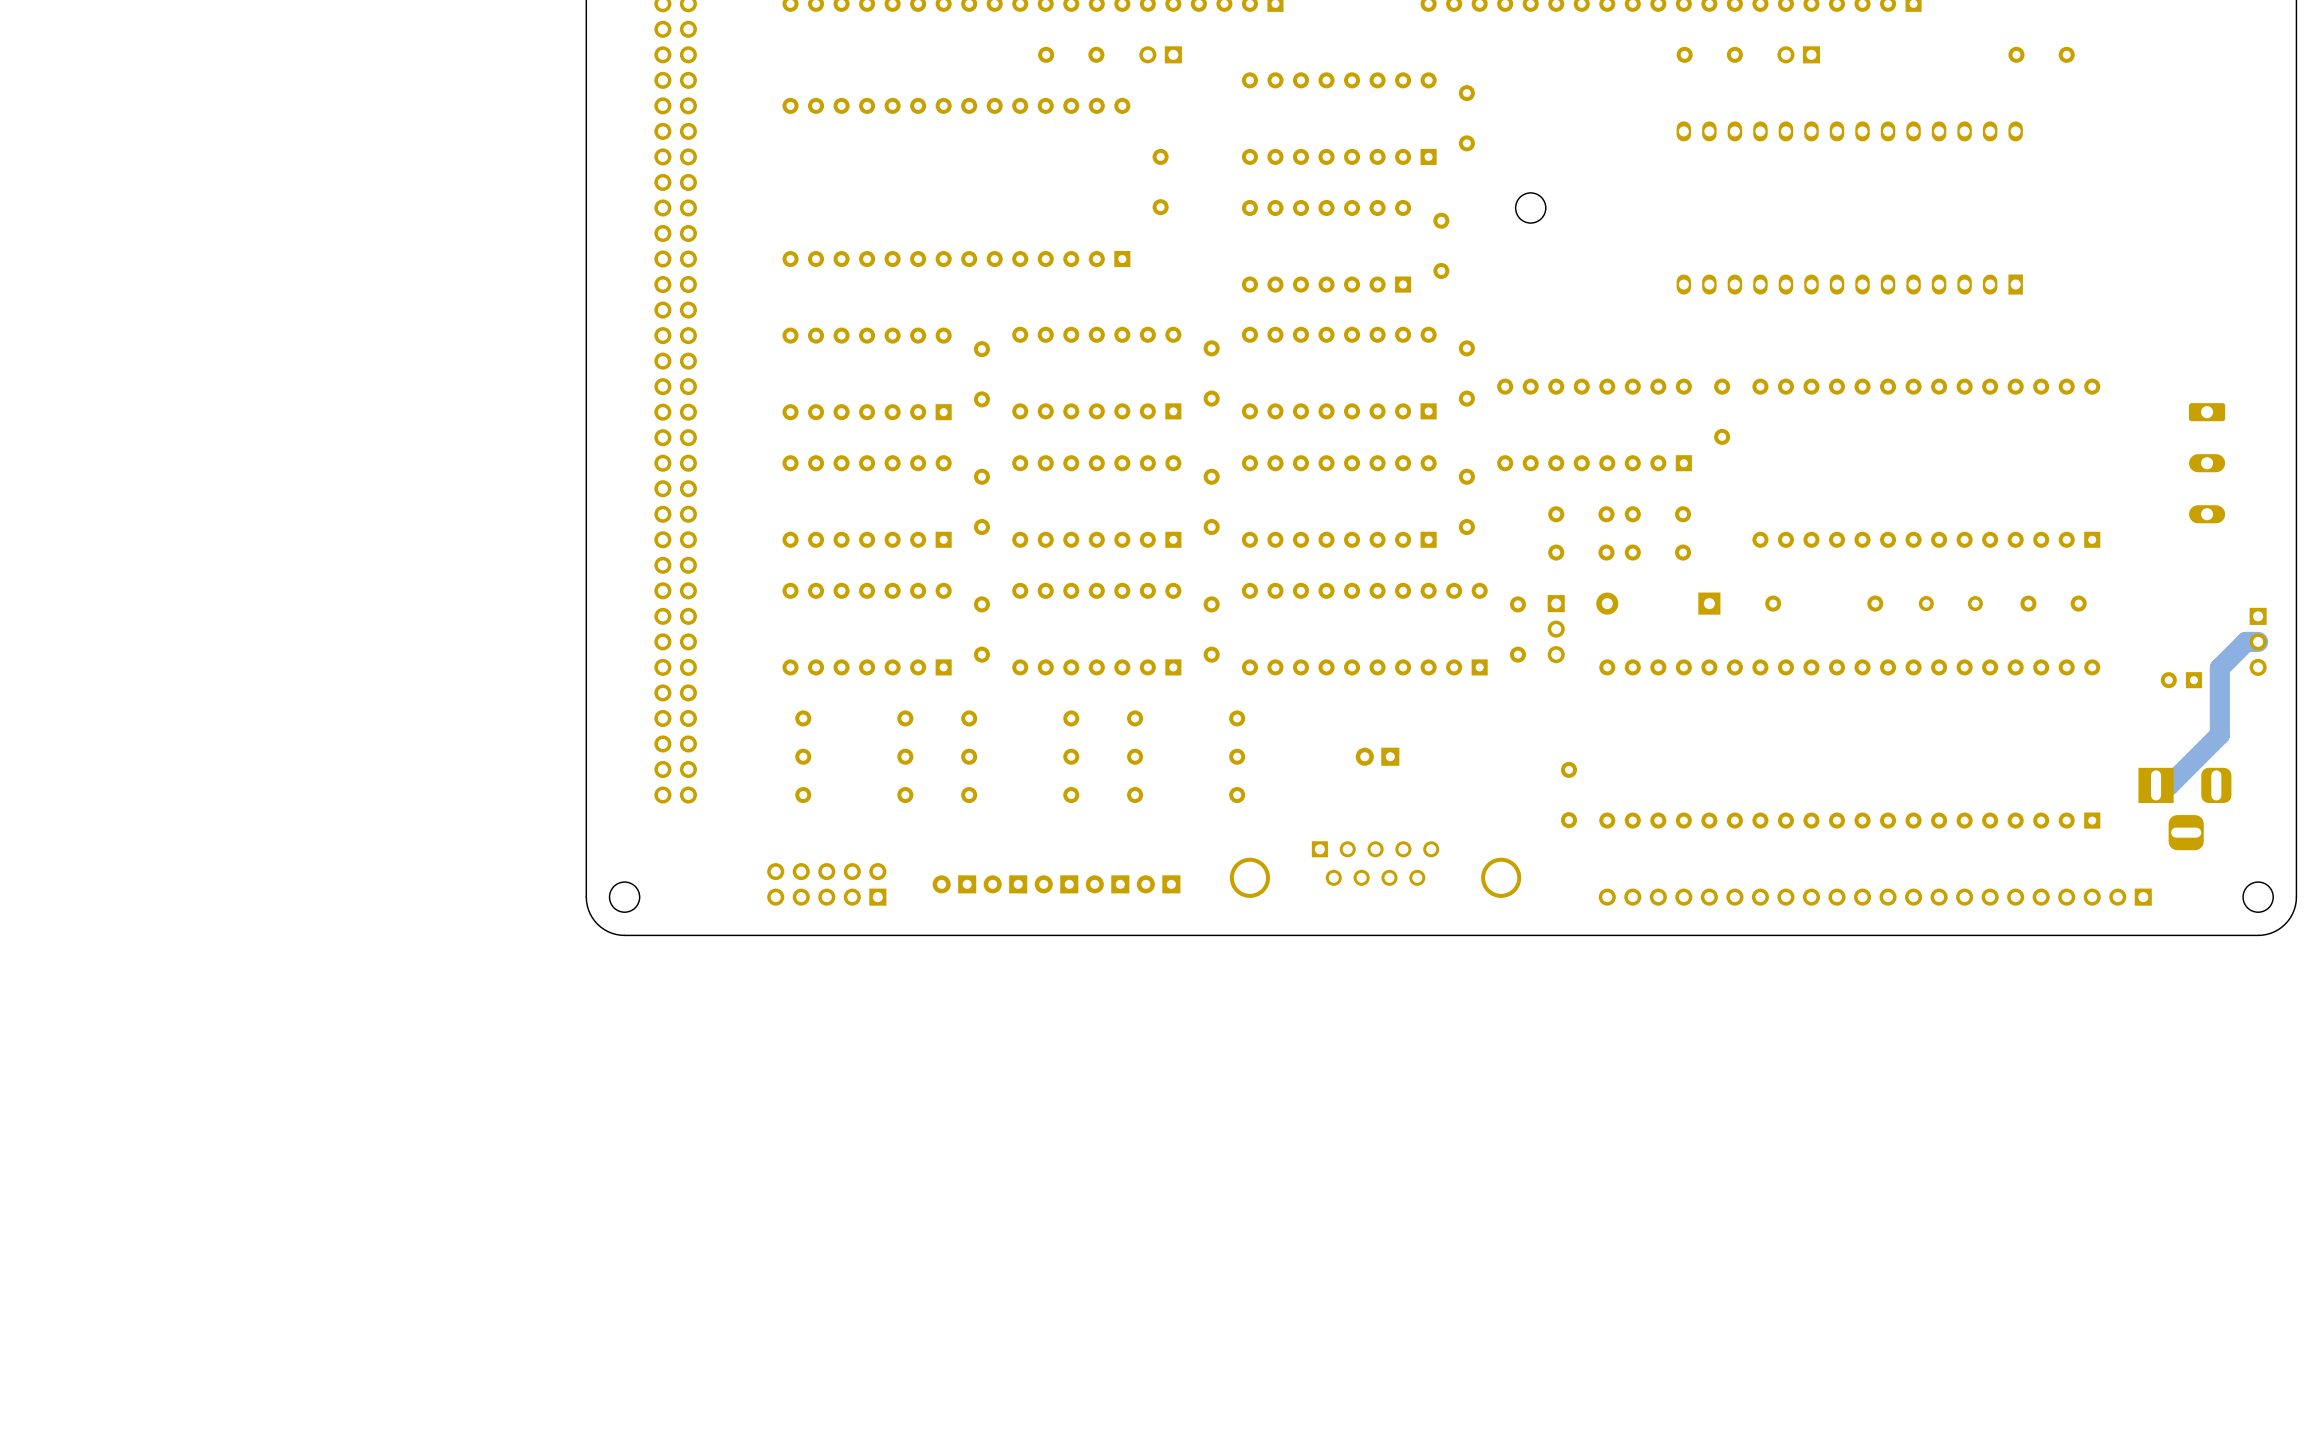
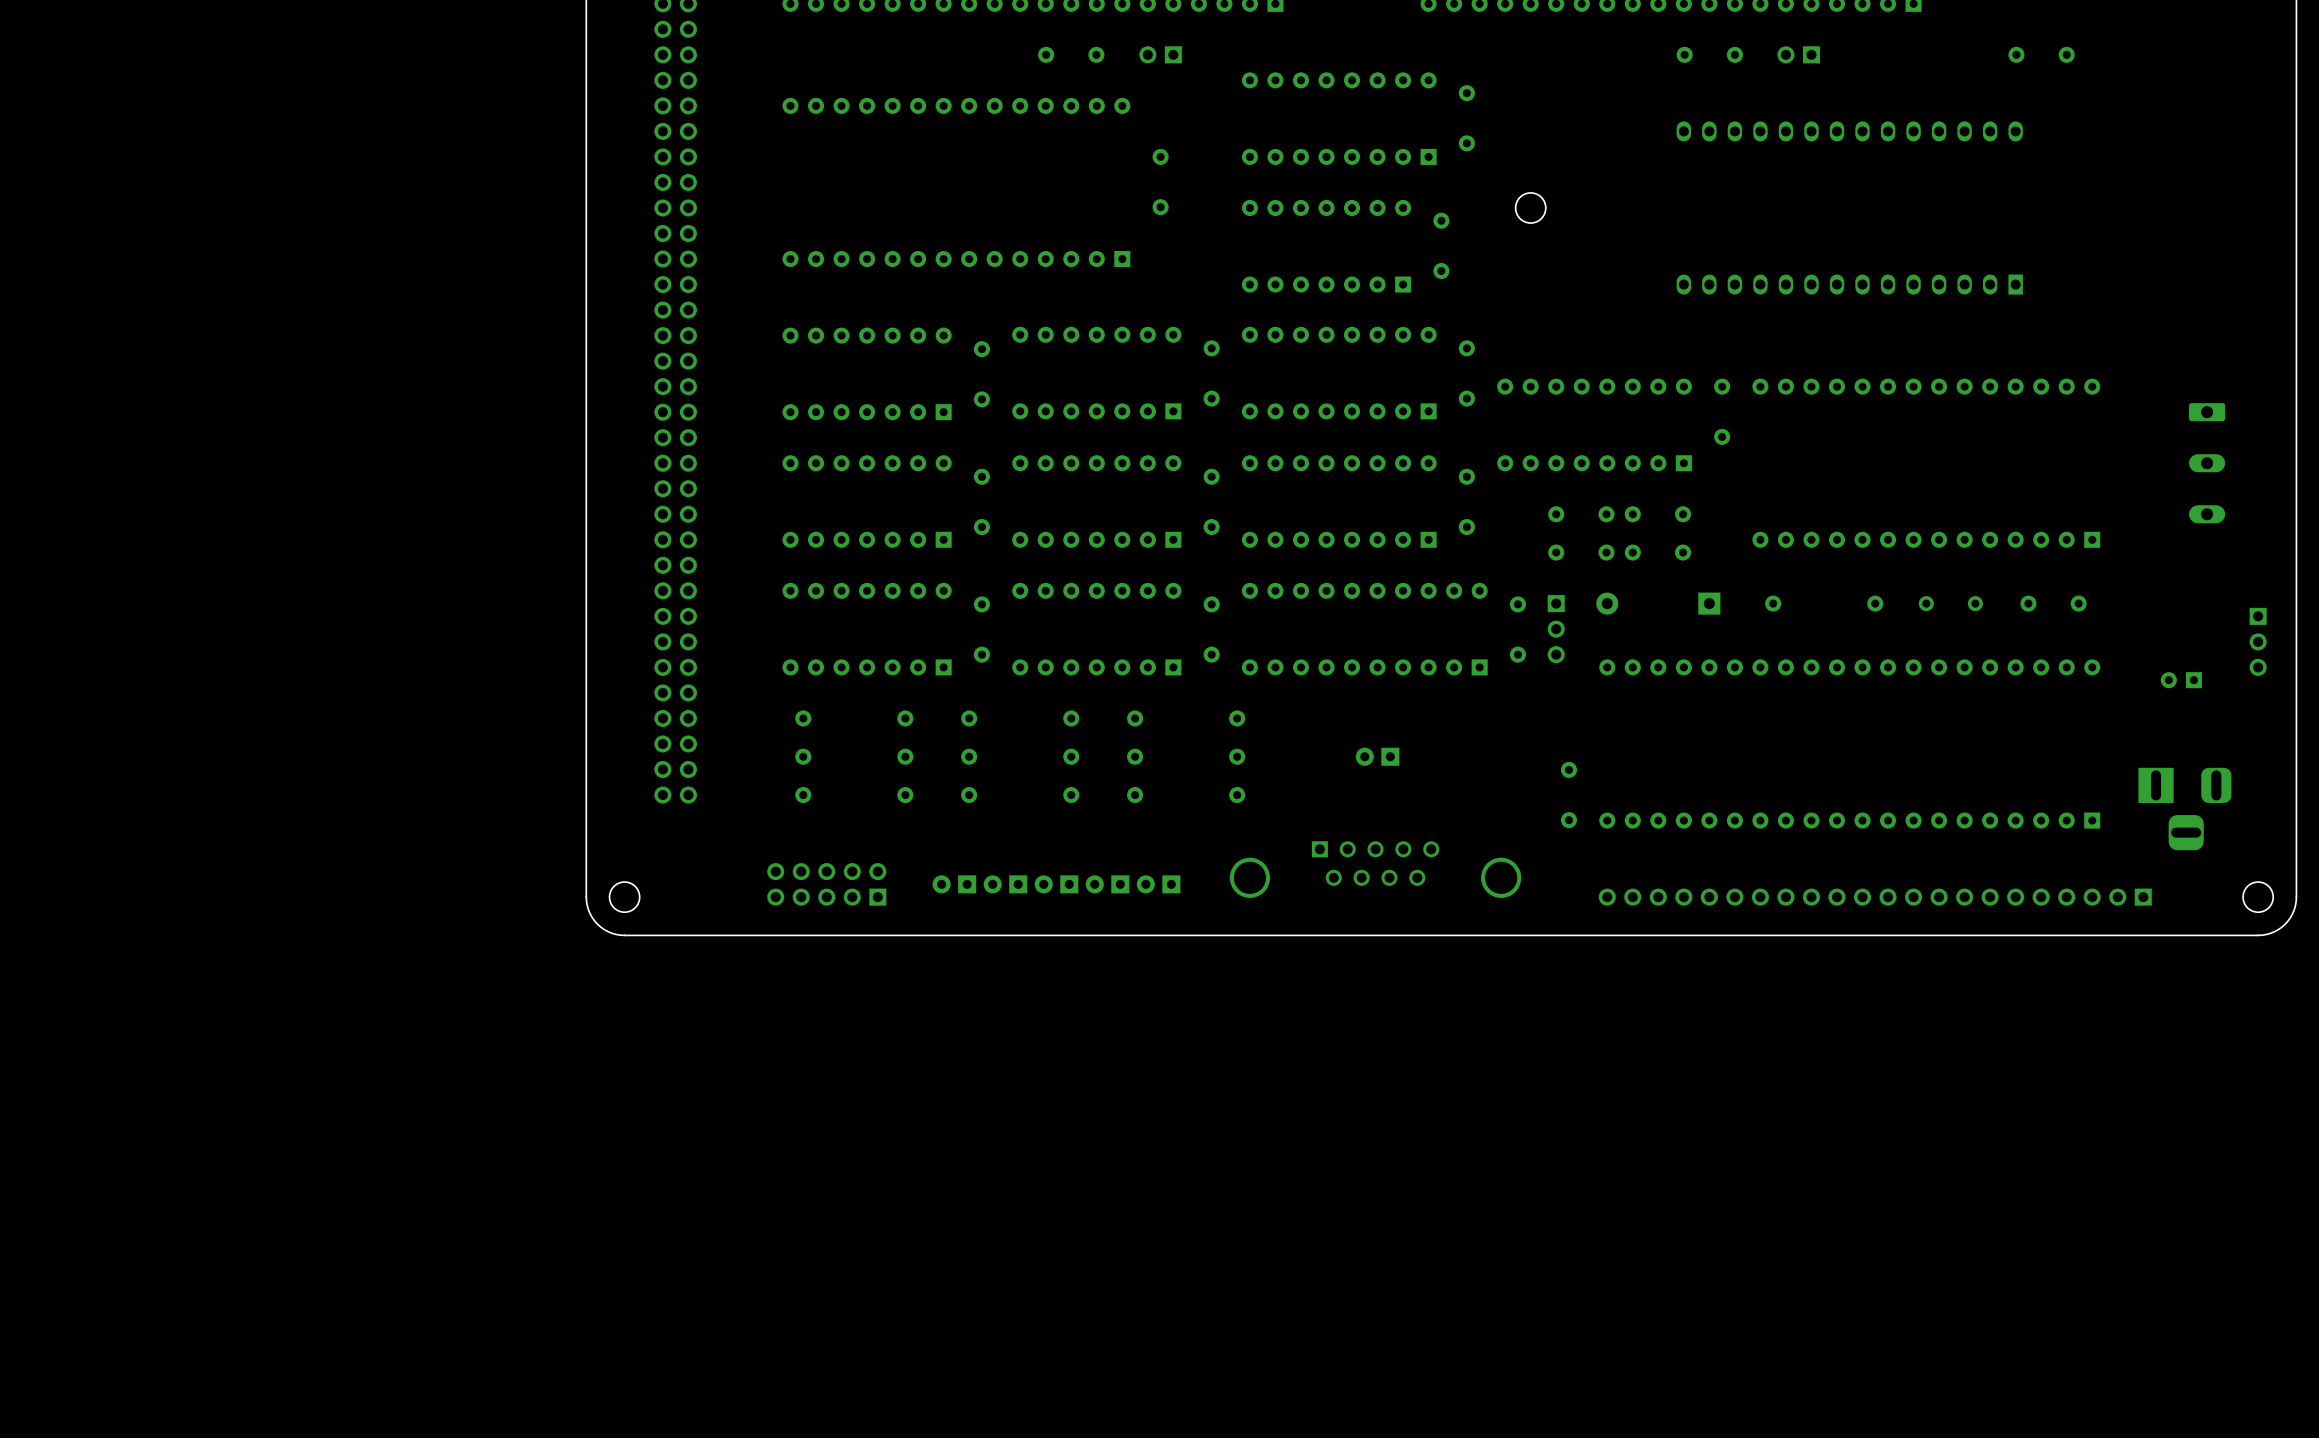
track: (2258, 641) (2246, 641) (2219, 668) (2219, 734) (2169, 785) (2156, 785) -> none

